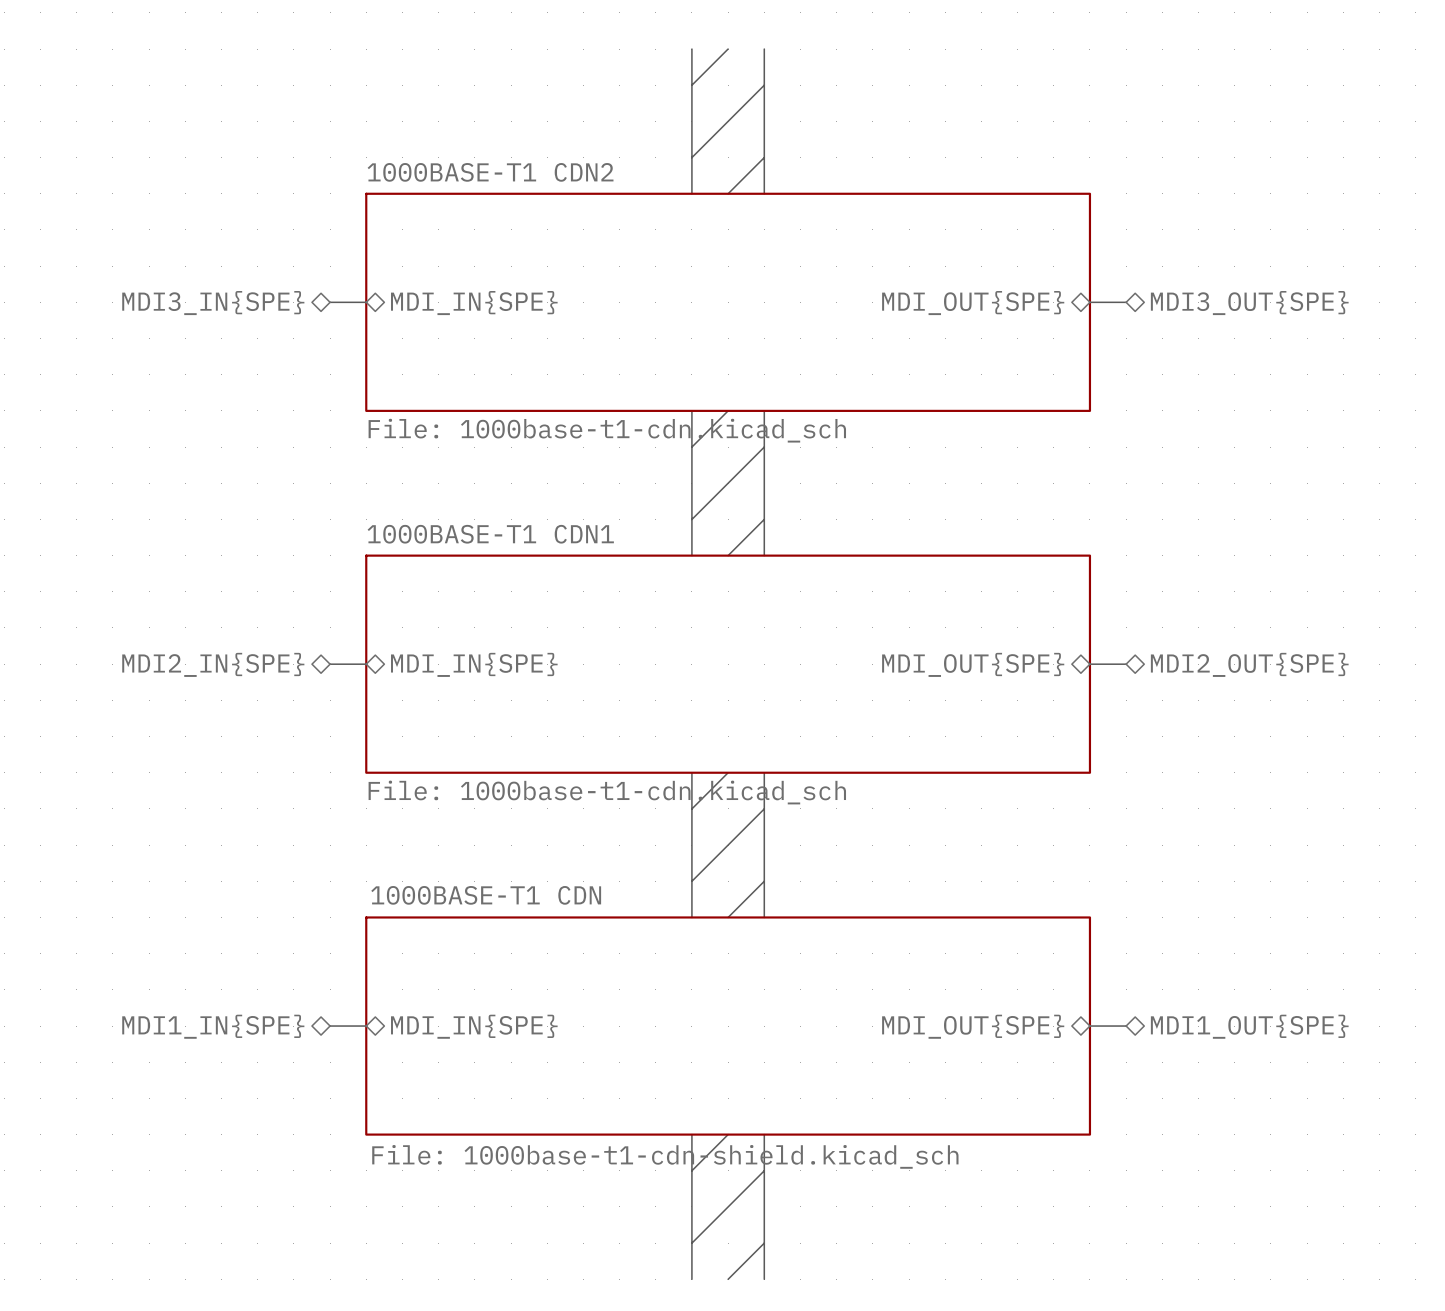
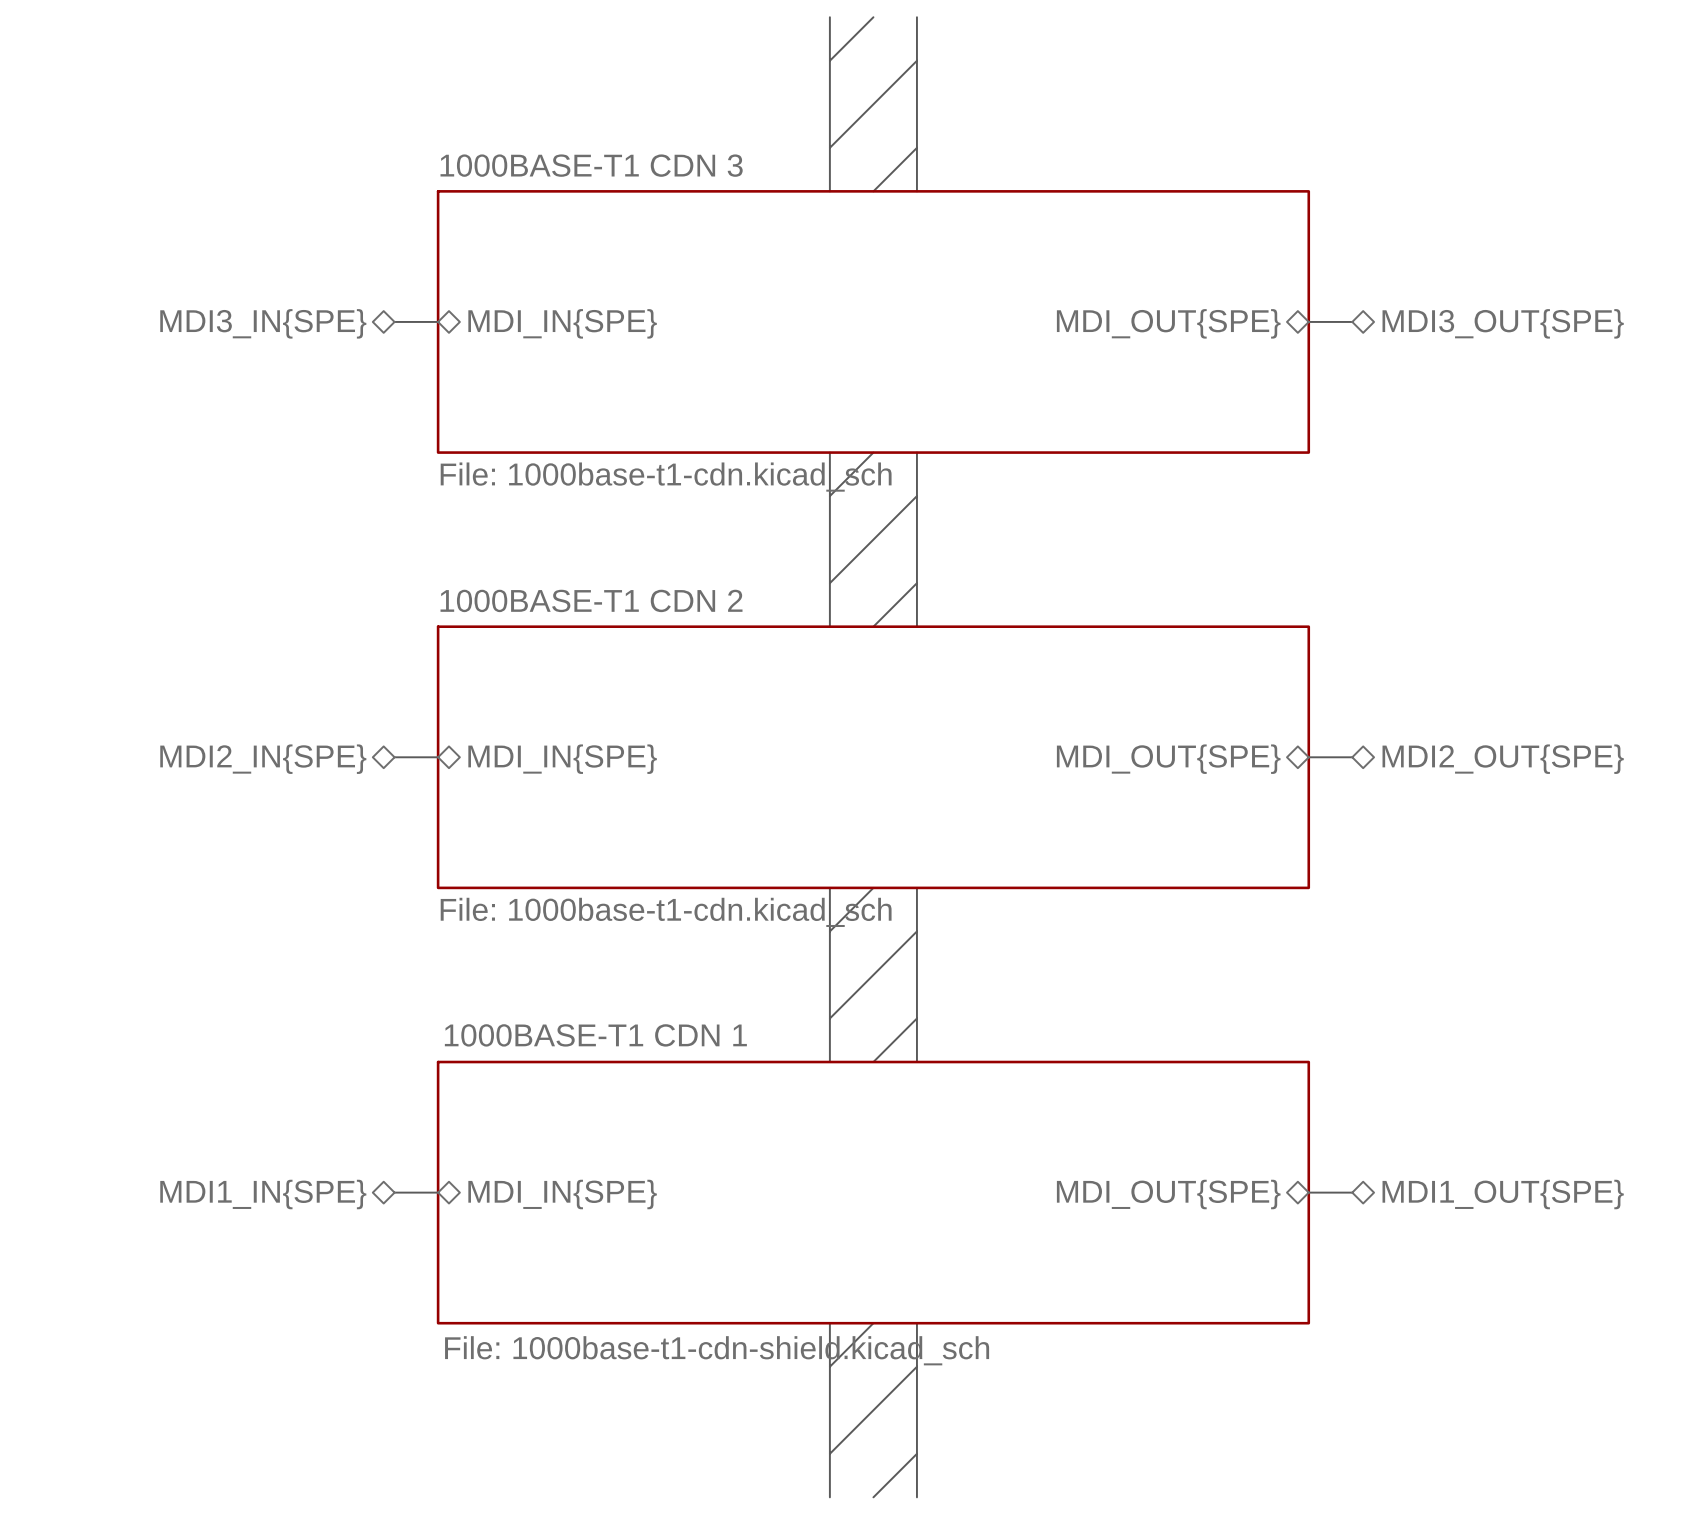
sheet 1000BASE-T1 CDN2 name: 1000BASE-T1 CDN2 (490, 172) -> 1000BASE-T1 CDN 3 (591, 165)
sheet 1000BASE-T1 CDN1 name: 1000BASE-T1 CDN1 (490, 534) -> 1000BASE-T1 CDN 2 (591, 600)
sheet 1000BASE-T1 CDN name: 1000BASE-T1 CDN (486, 895) -> 1000BASE-T1 CDN 1 (595, 1035)

